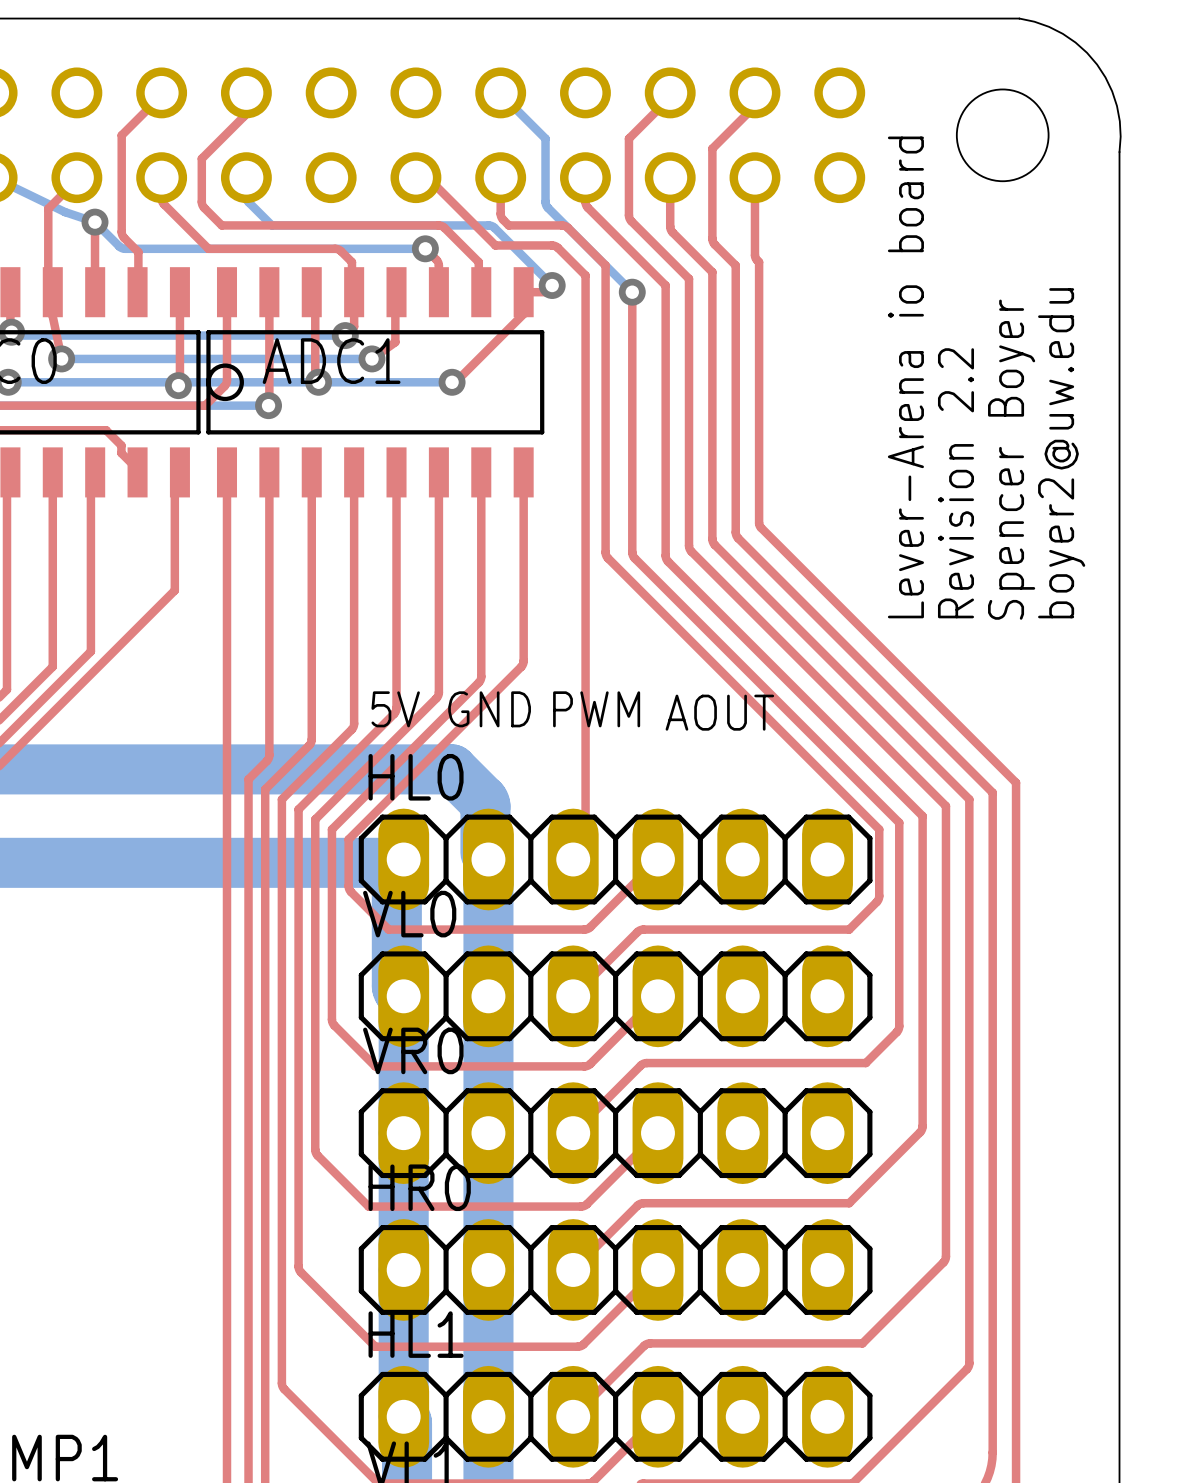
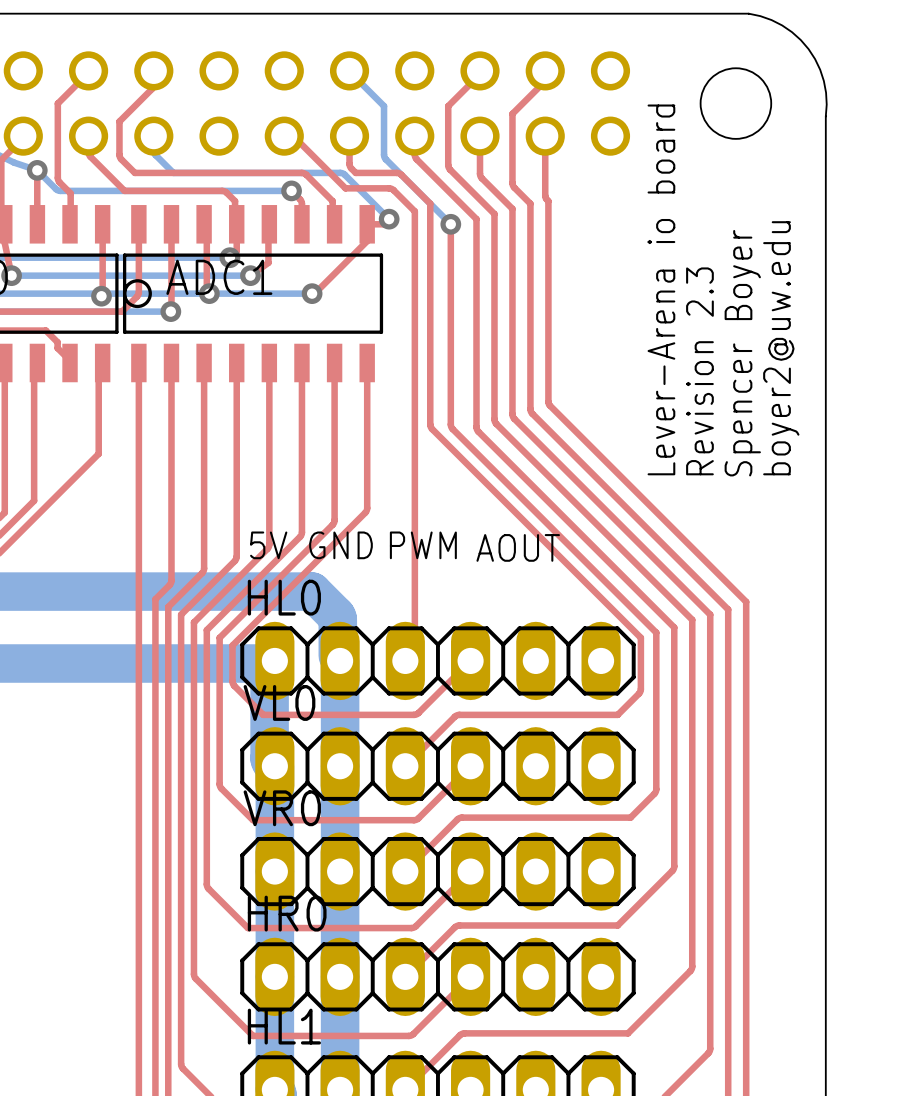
text: Revision 2.2 (955, 483) -> Revision 2.3 (699, 371)

